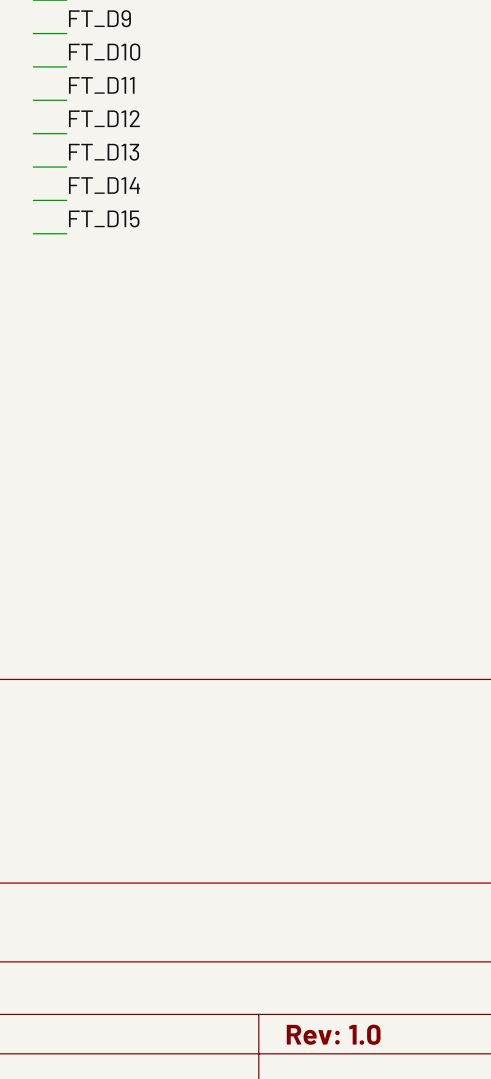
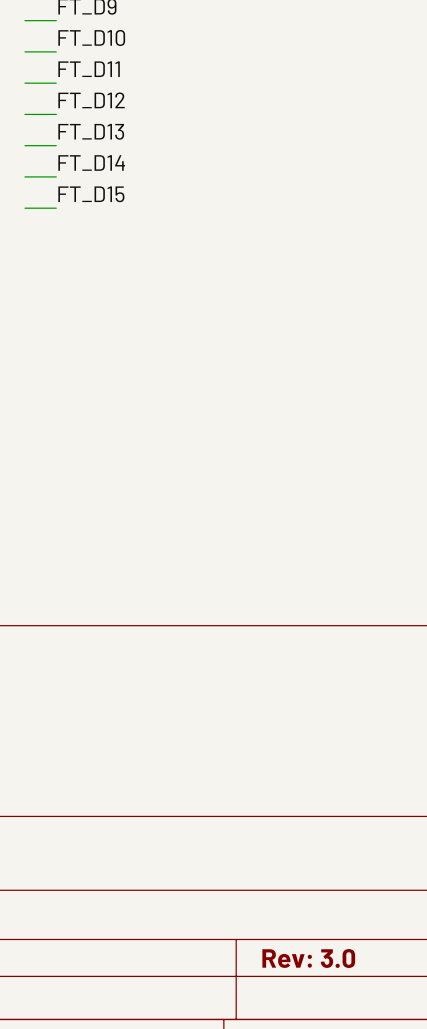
title block: Rev: 1.0 (333, 1034) -> Rev: 3.0 (308, 958)

